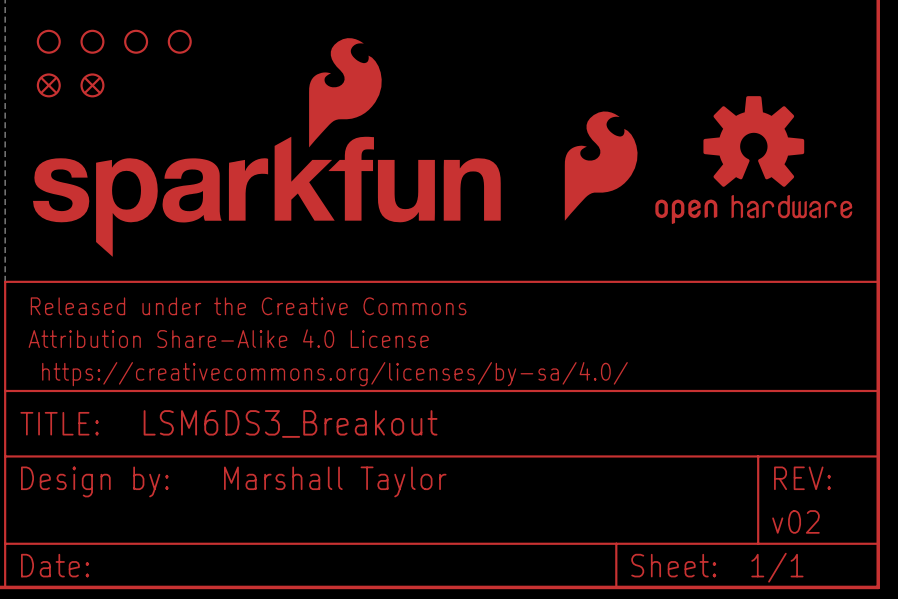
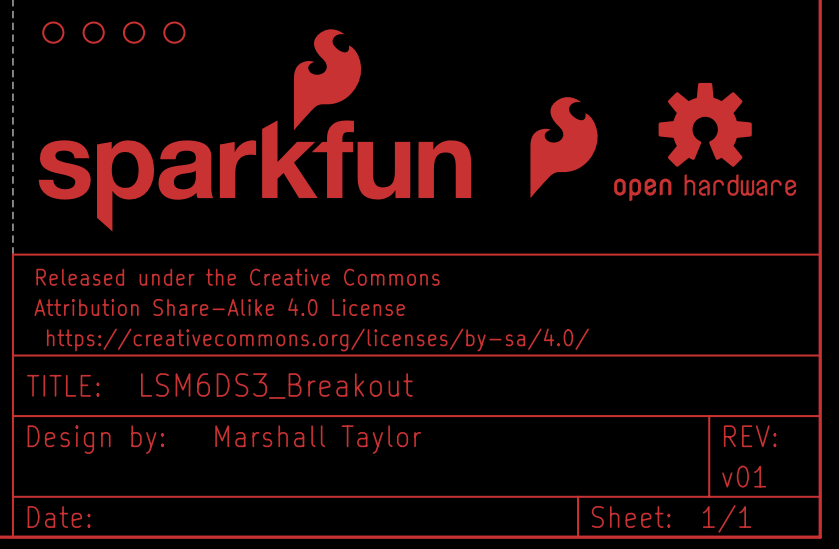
part: (48, 85) -> none
part: (92, 85) -> none
part text: v02 (795, 521) -> v01 (744, 476)

